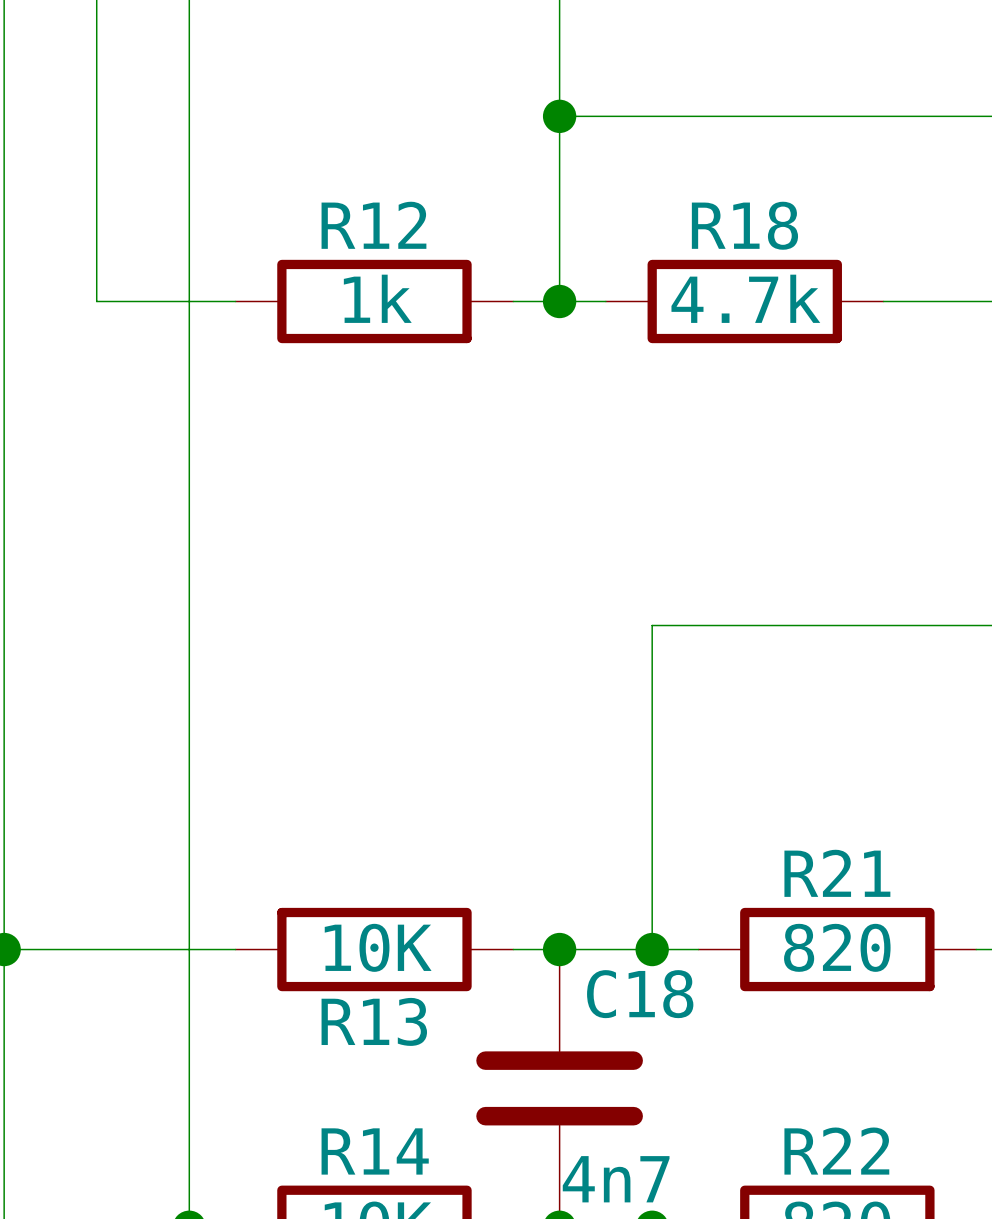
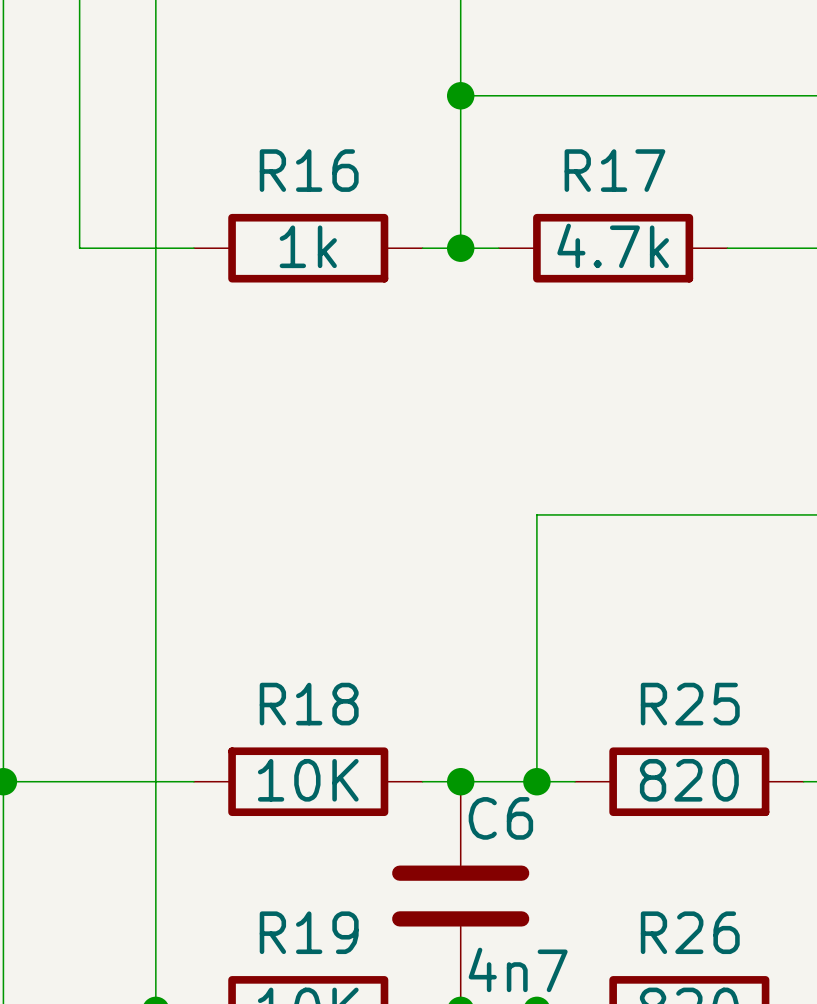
R12 name: R12 (373, 225) -> R16 (309, 170)
R18 name: R18 (744, 225) -> R17 (614, 170)
R21 name: R21 (837, 873) -> R25 (690, 704)
C18 name: C18 (640, 994) -> C6 (500, 818)
R13 name: R13 (374, 1021) -> R18 (309, 704)
R14 name: R14 (375, 1151) -> R19 (309, 932)
R22 name: R22 (836, 1151) -> R26 (690, 932)

